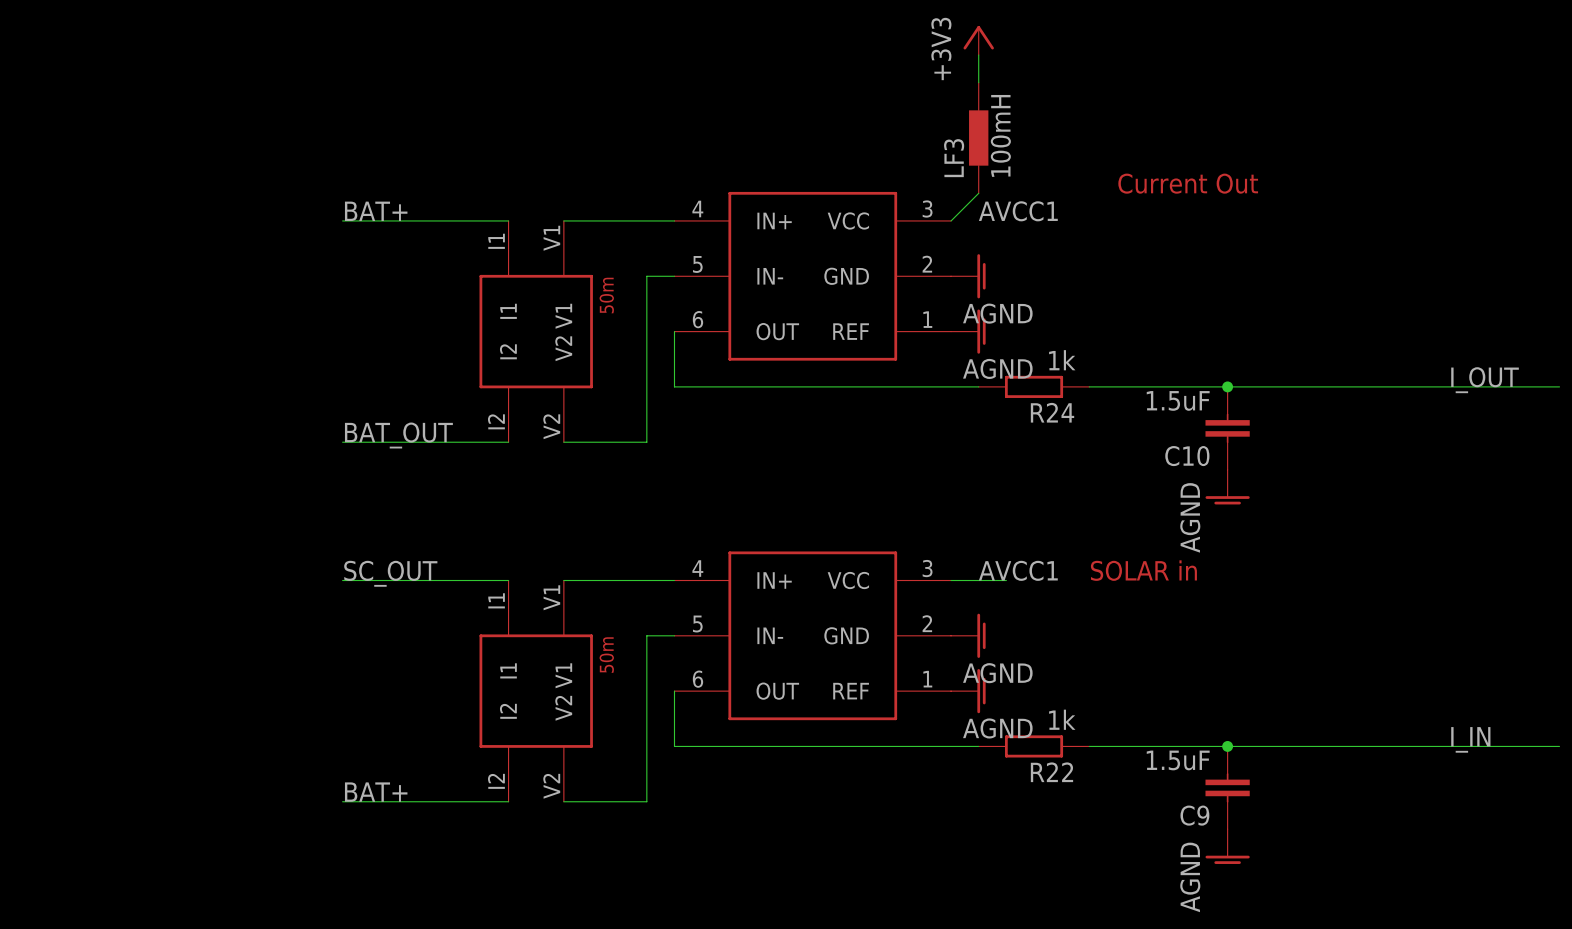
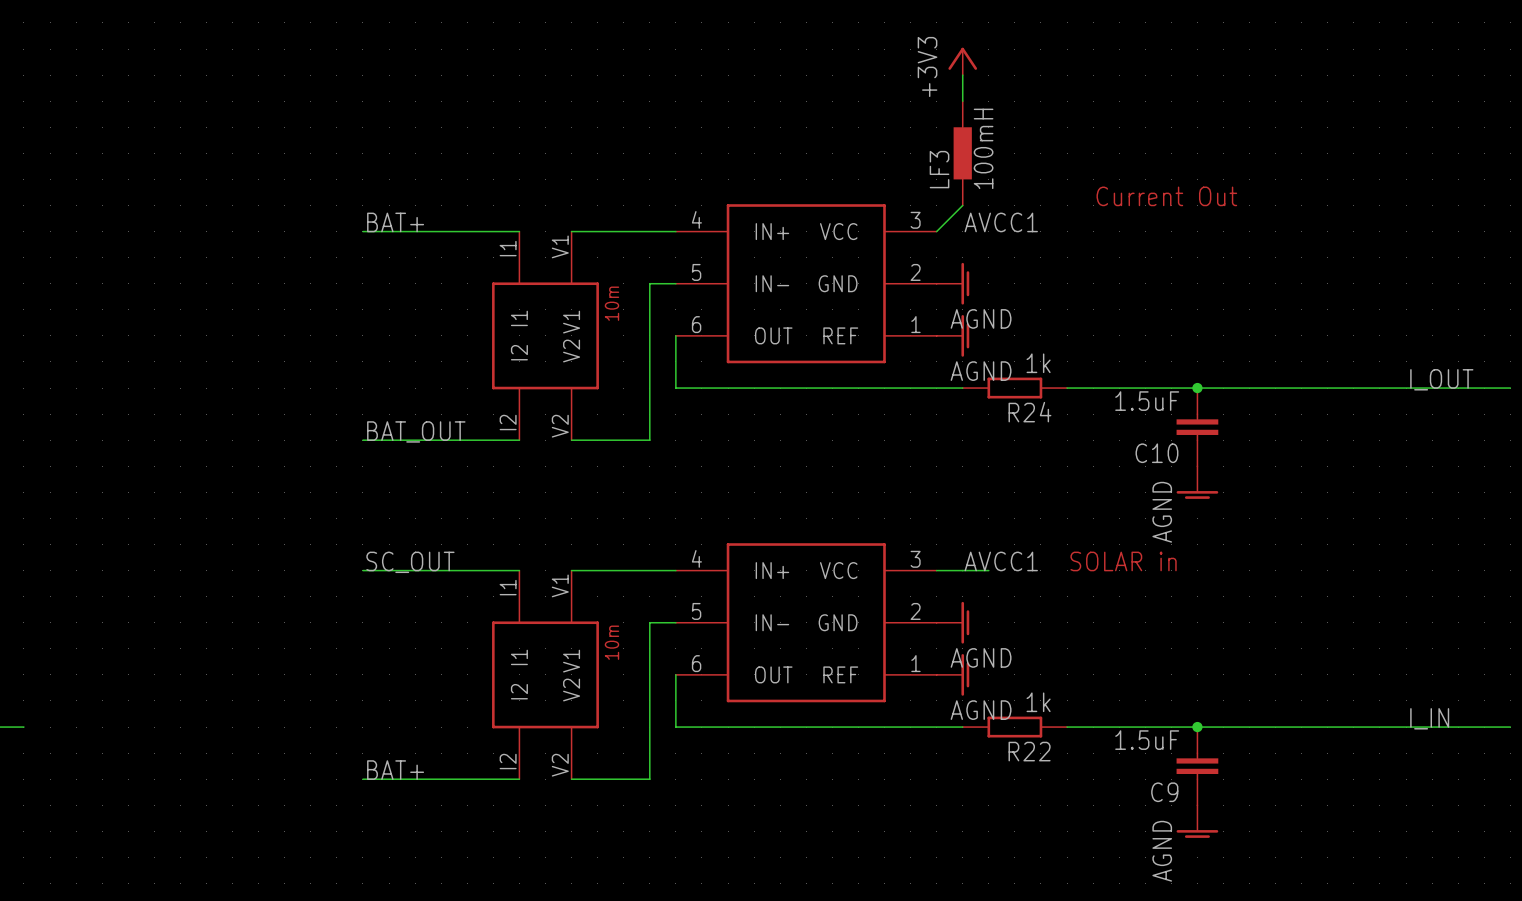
part value: 50m (606, 295) -> 10m (611, 303)
part value: 50m (606, 655) -> 10m (611, 642)

